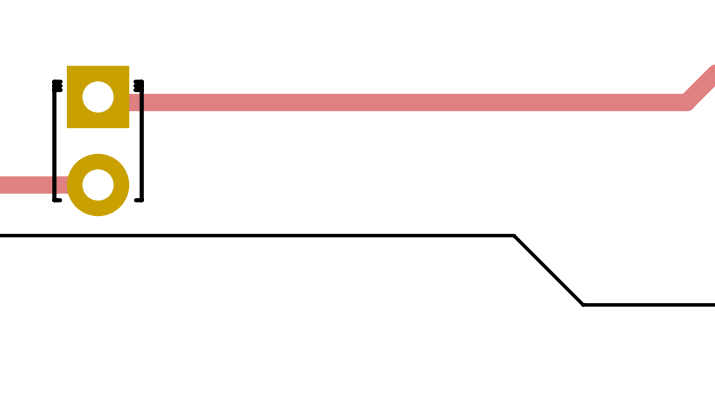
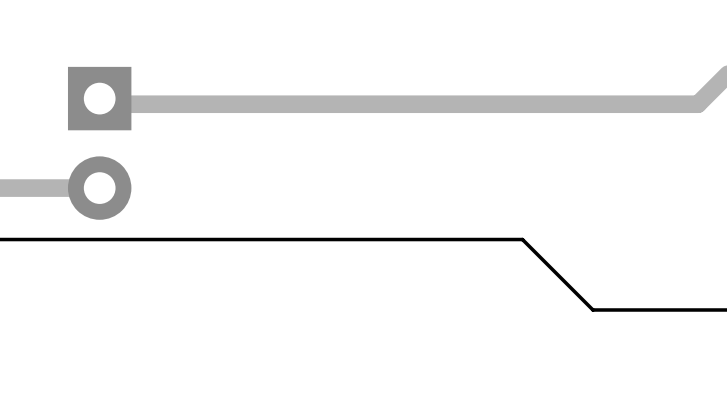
part footprint: [52, 65, 144, 217] -> [67, 66, 132, 220]

